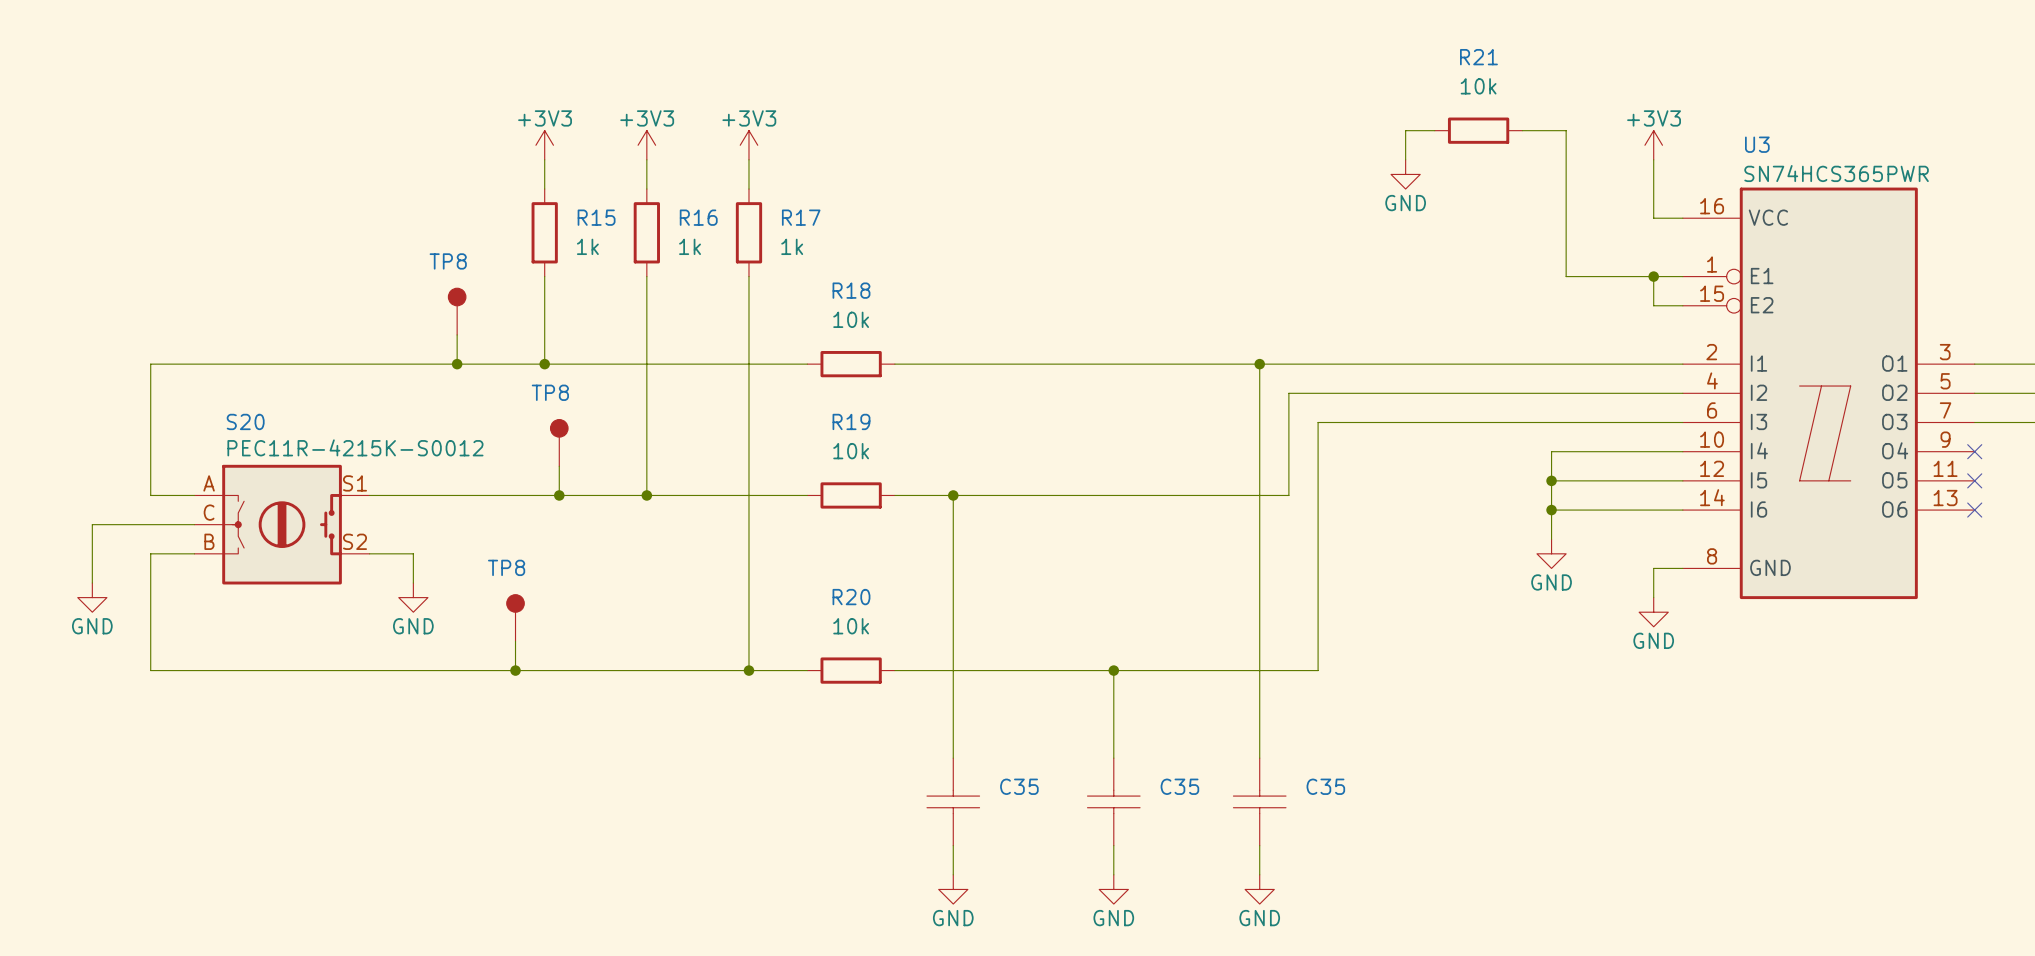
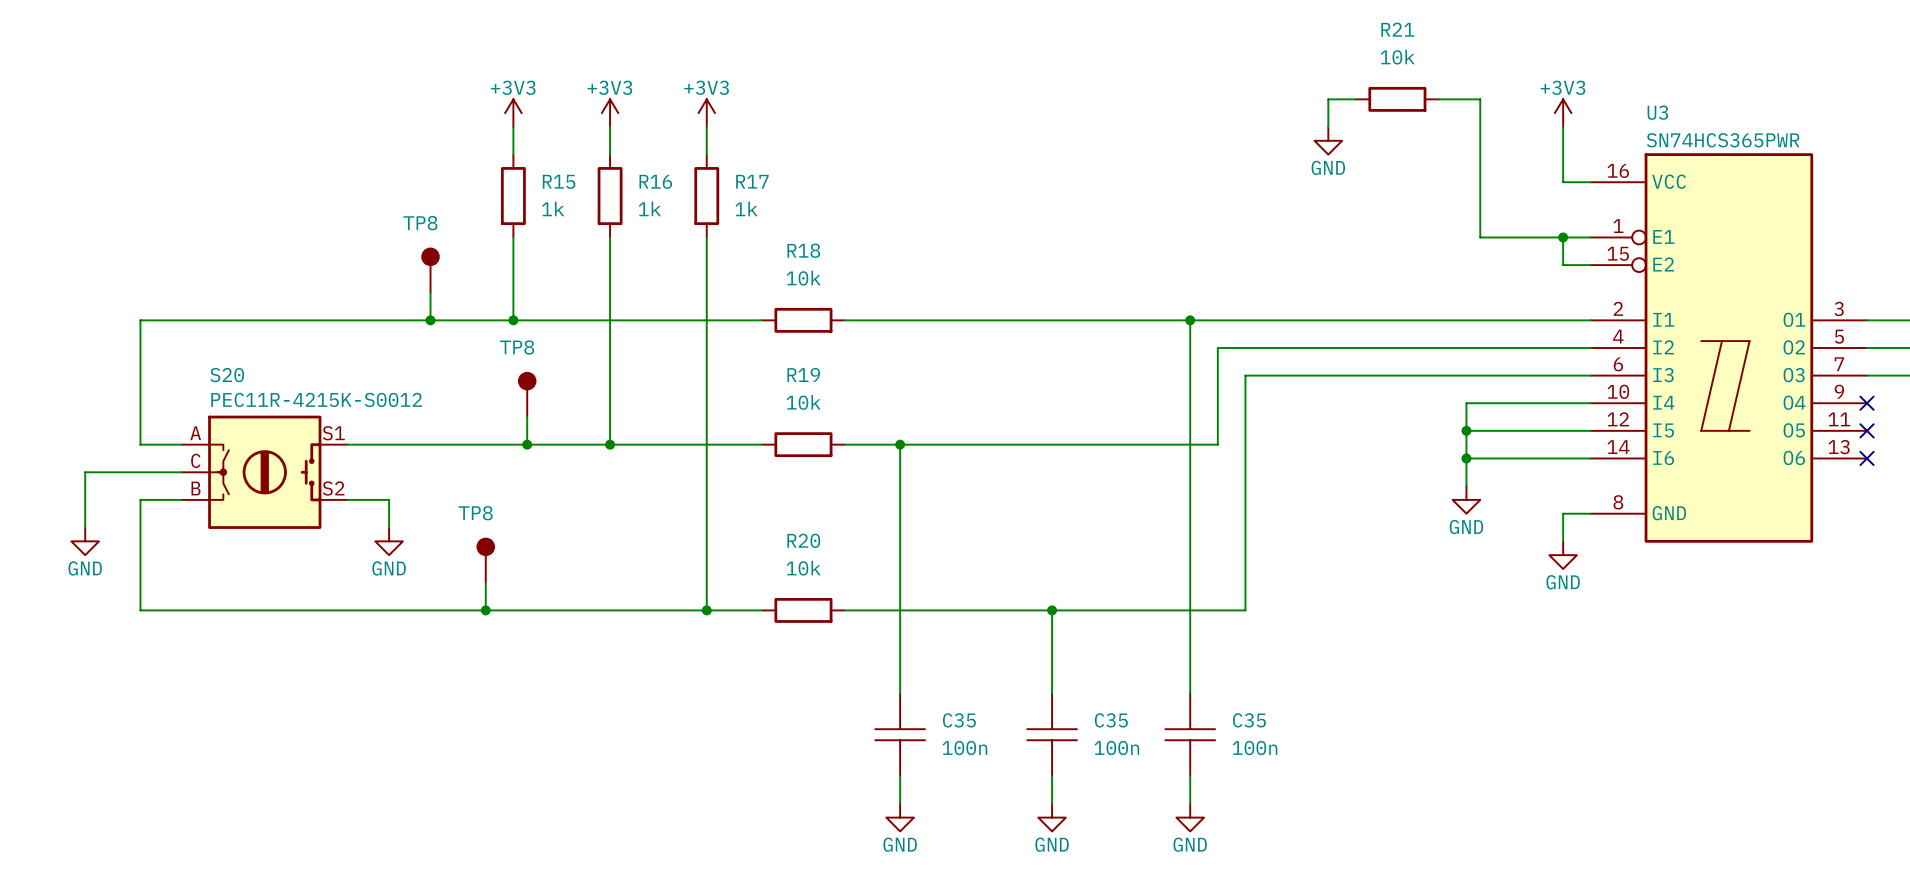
C35 value: none -> 100n (964, 748)
C35 value: none -> 100n (1116, 748)
C35 value: none -> 100n (1255, 748)

